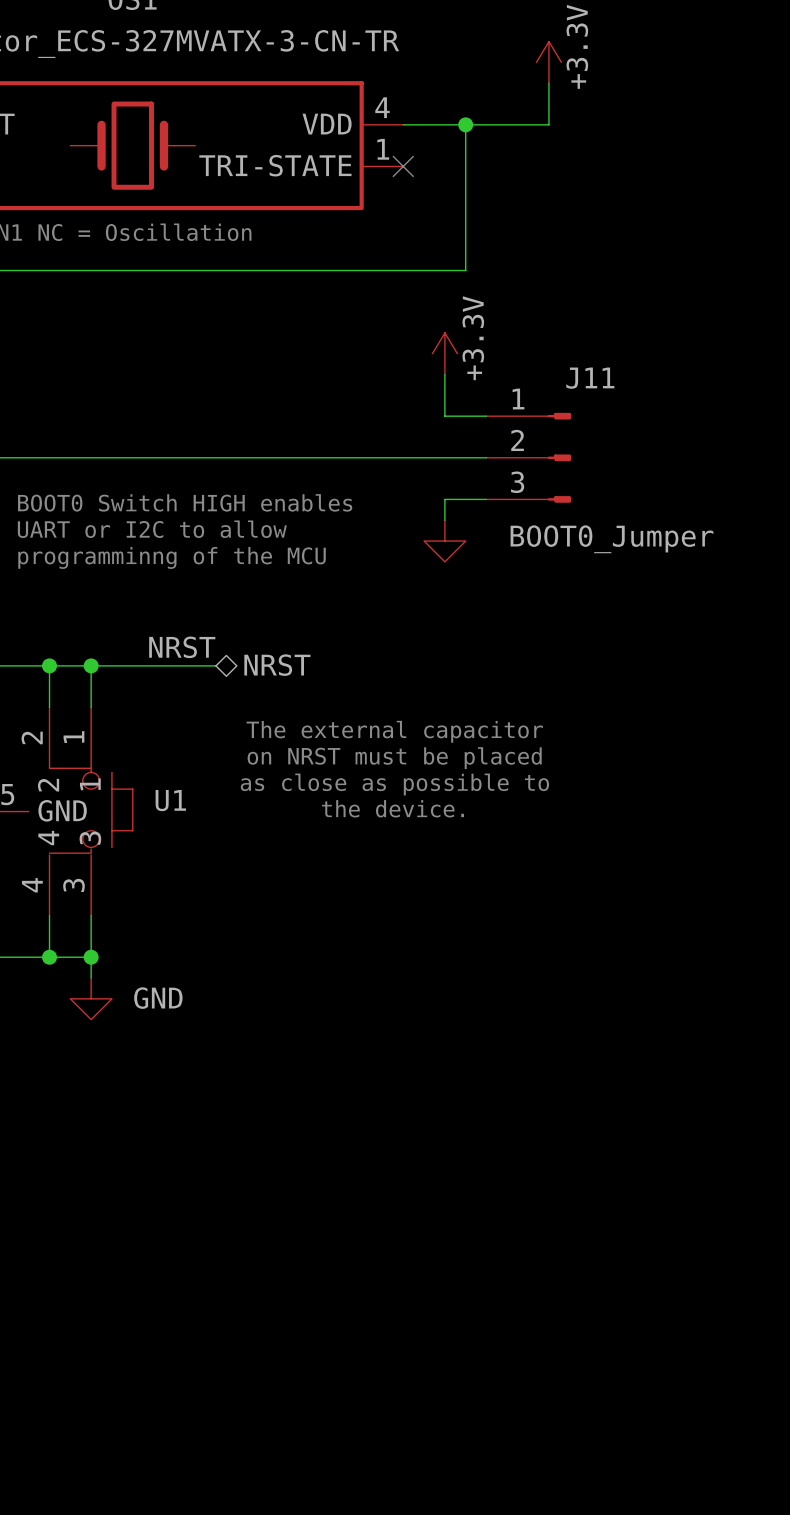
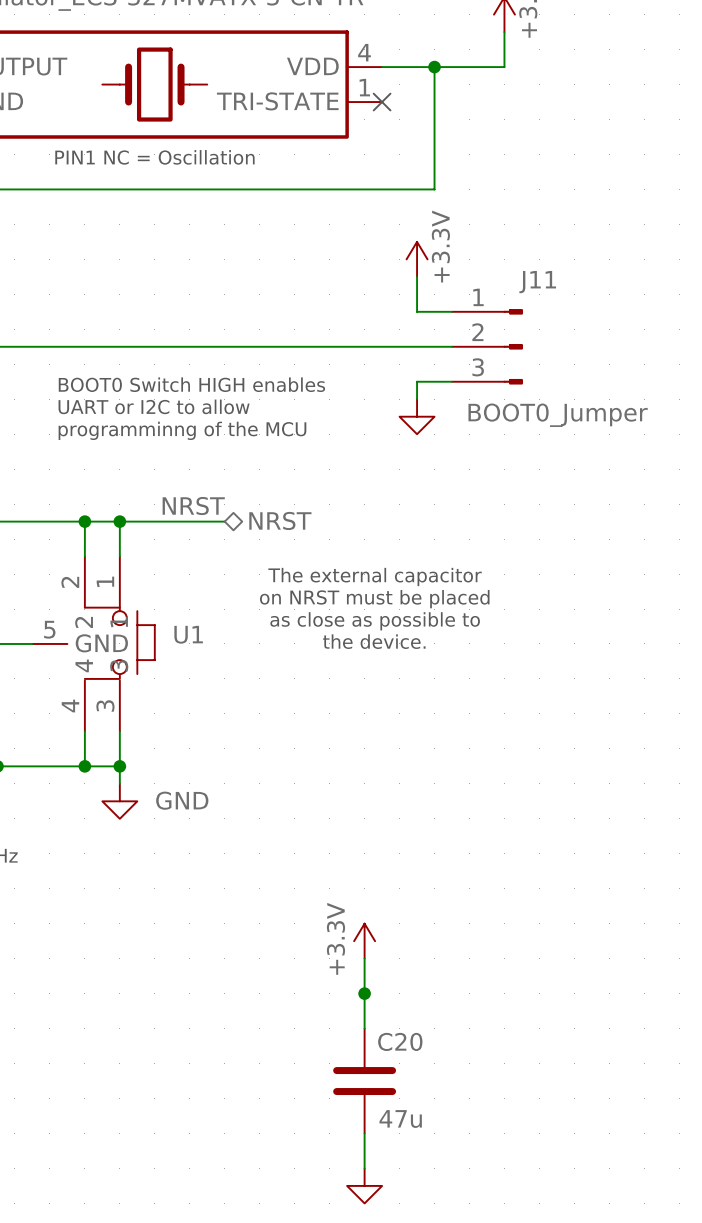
power symbol: none -> +3.3V (364, 941)
wire: none -> (364, 958) (364, 1028)
junction: none -> (364, 993)
C20: none -> 47u (364, 1081)
wire: none -> (364, 1133) (364, 1168)
power symbol: none -> (364, 1185)

